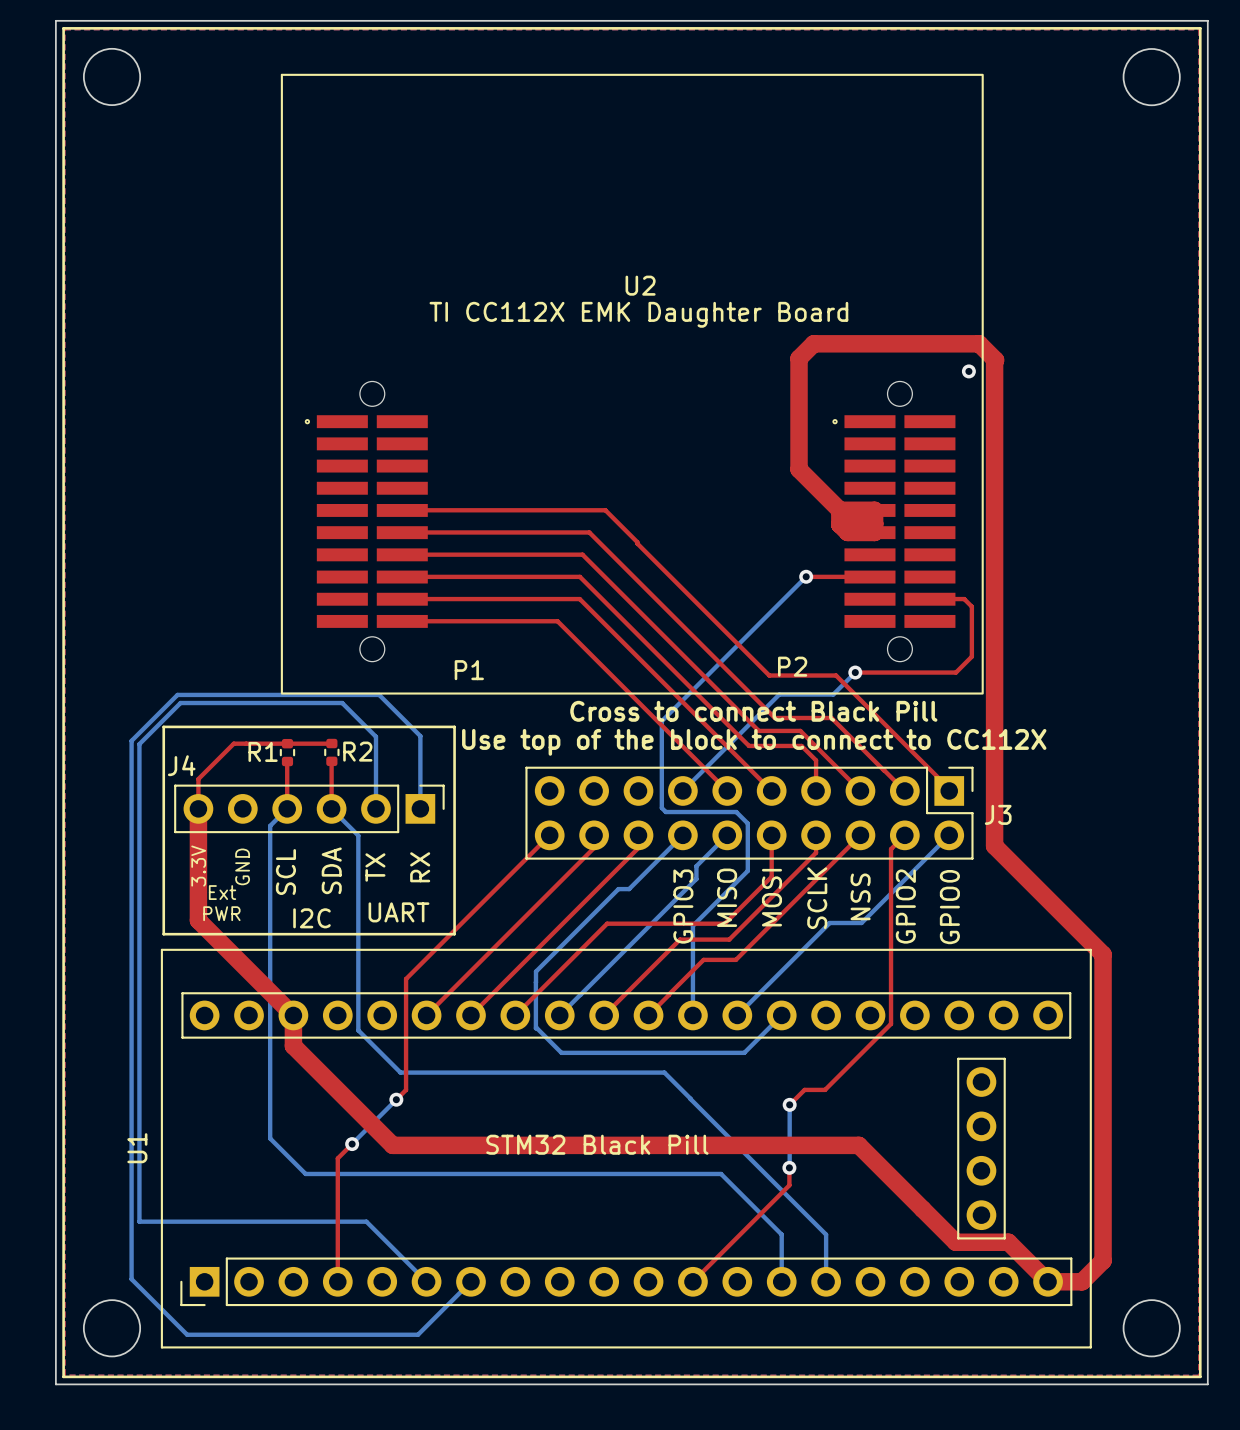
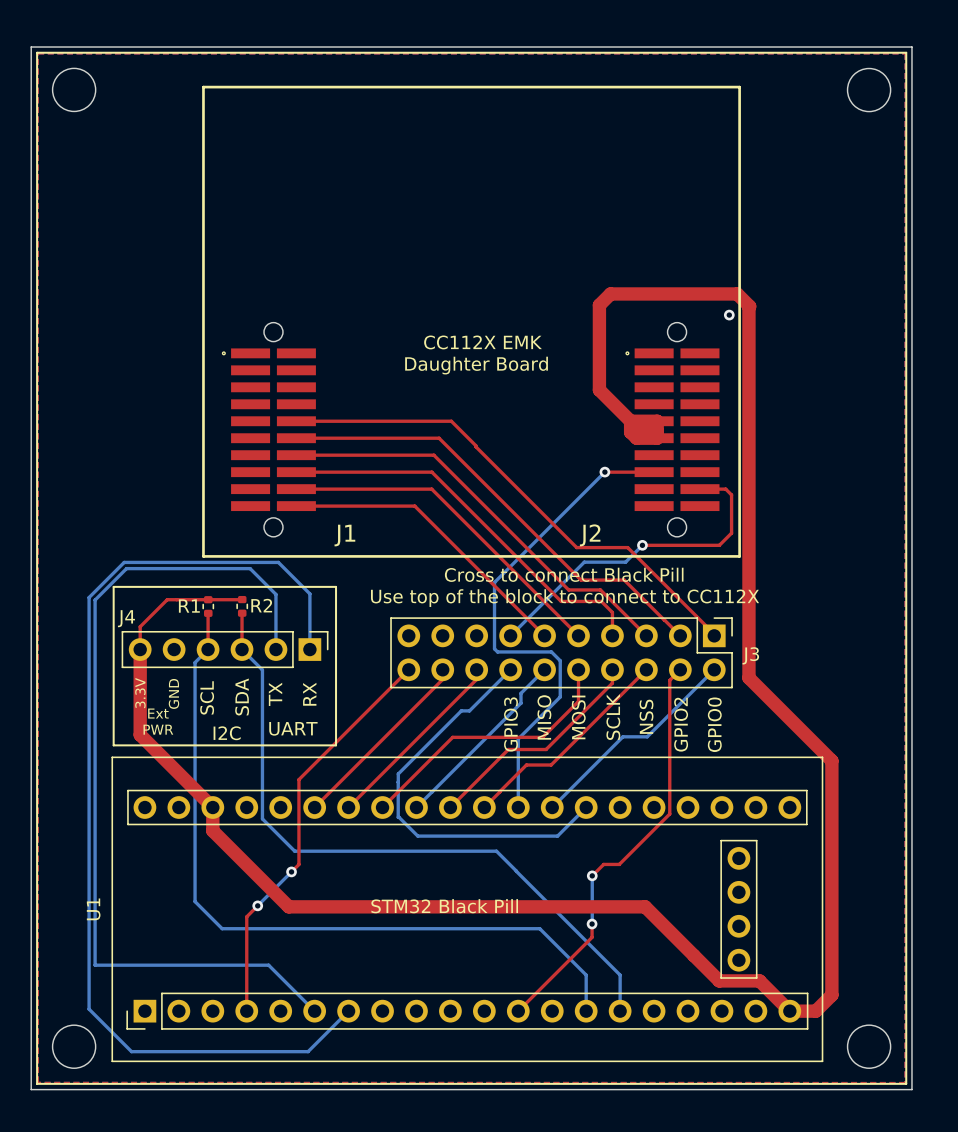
line: none -> (203, 87) (739, 87) (739, 556) (203, 556) (203, 87)
U2: TI CC112X EMK Daughter Board (632, 384) -> none
text: none -> CC112X EMK (483, 342)
text: none -> Daughter Board (476, 365)
J1: none -> (268, 429)
J2: none -> (672, 429)

